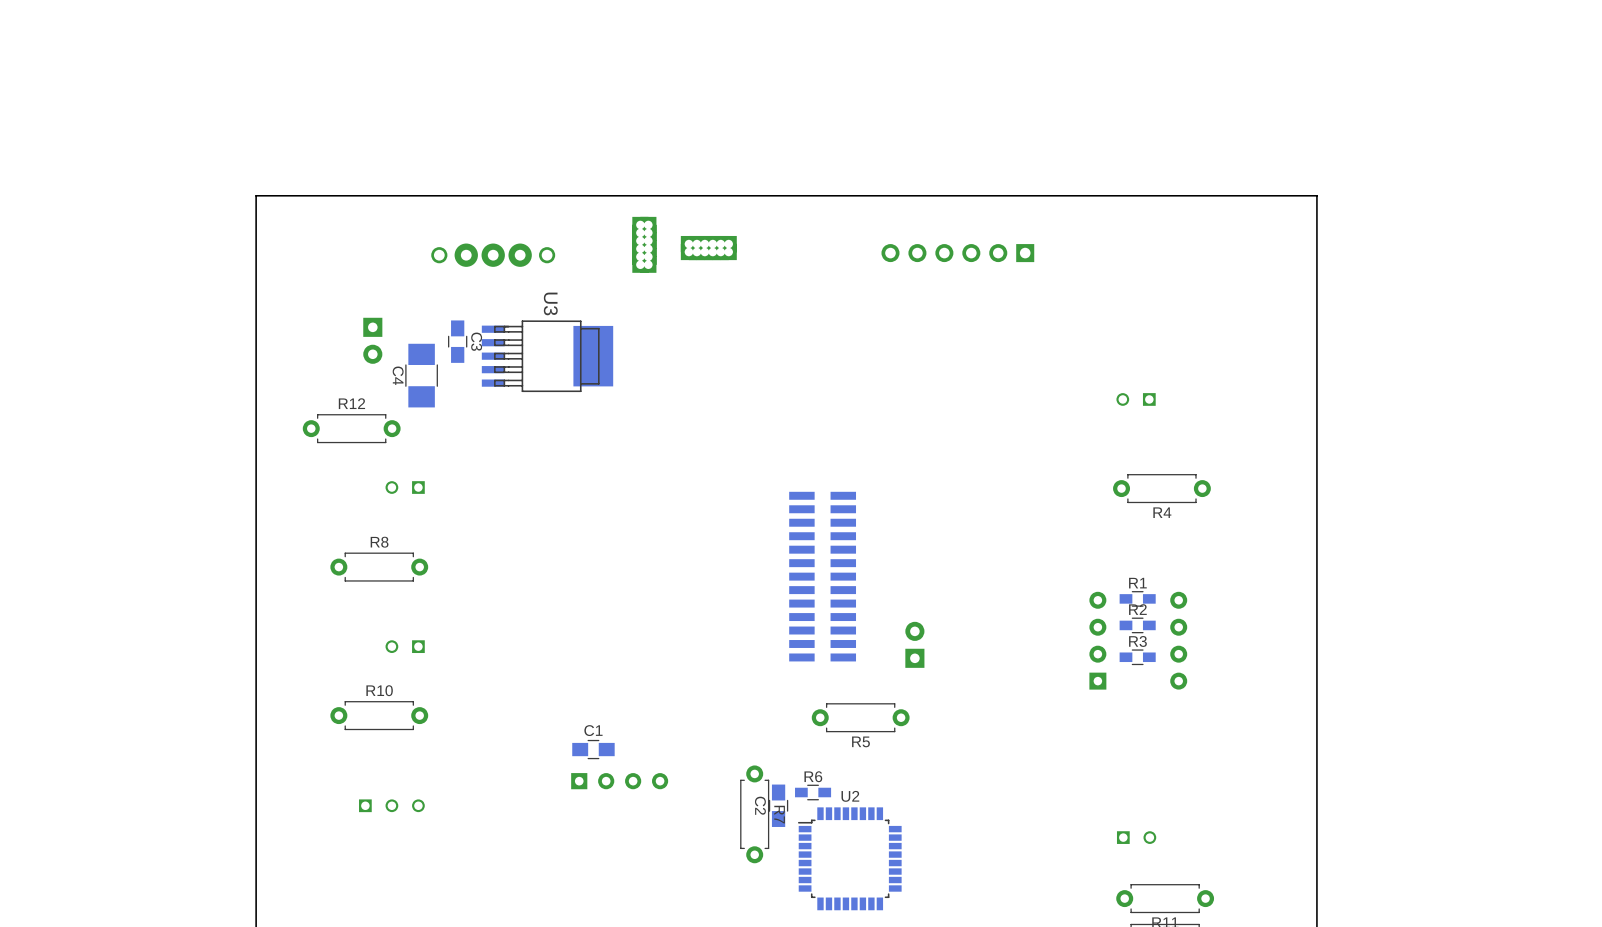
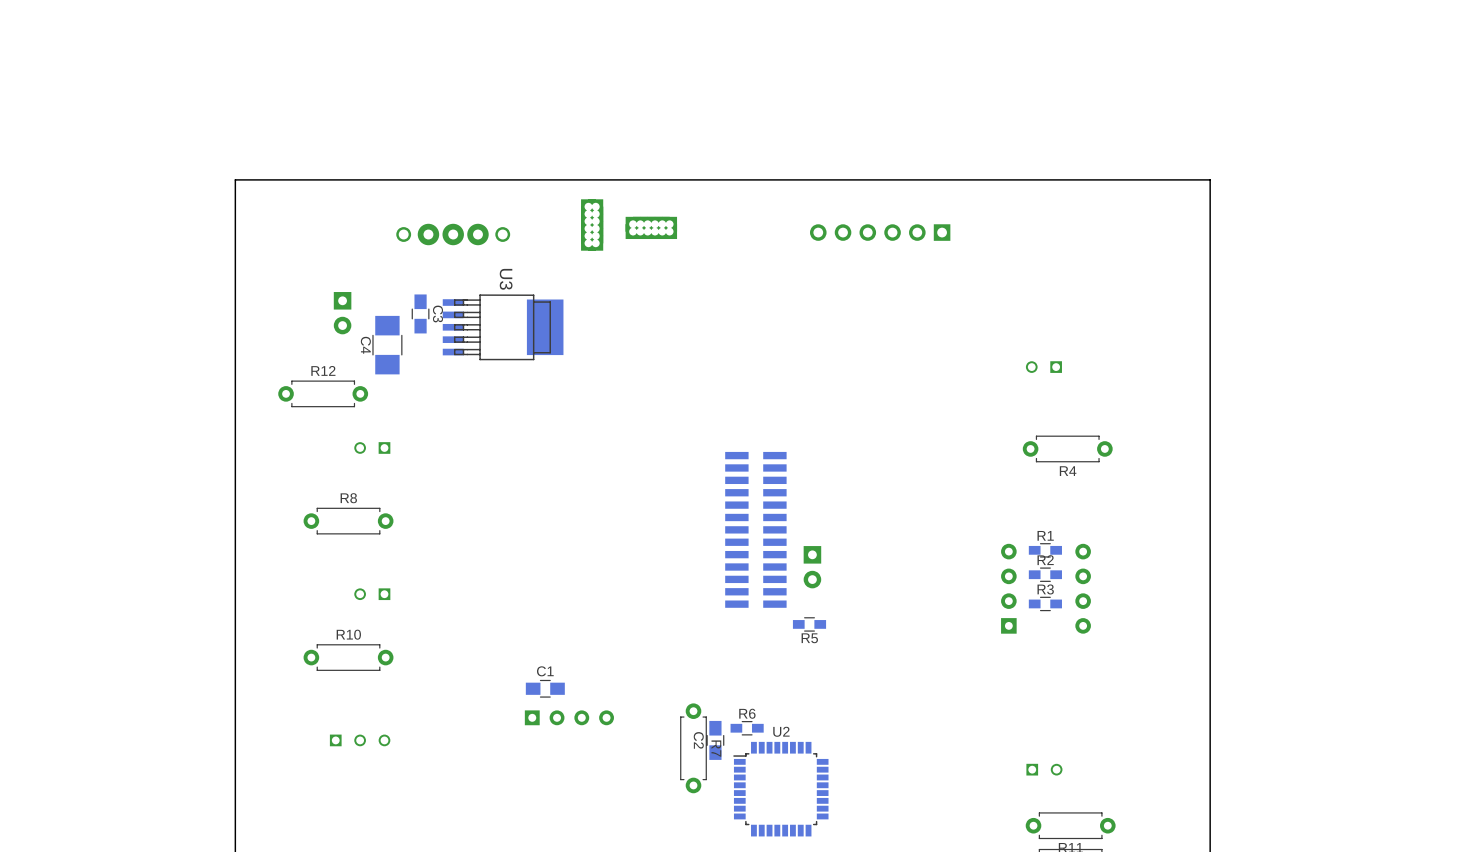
part rotation: 0° (914, 644) -> 180° (812, 567)
part position: (914, 644) -> (812, 567)
R5 footprint: [811, 703, 910, 733] -> [792, 617, 827, 632]

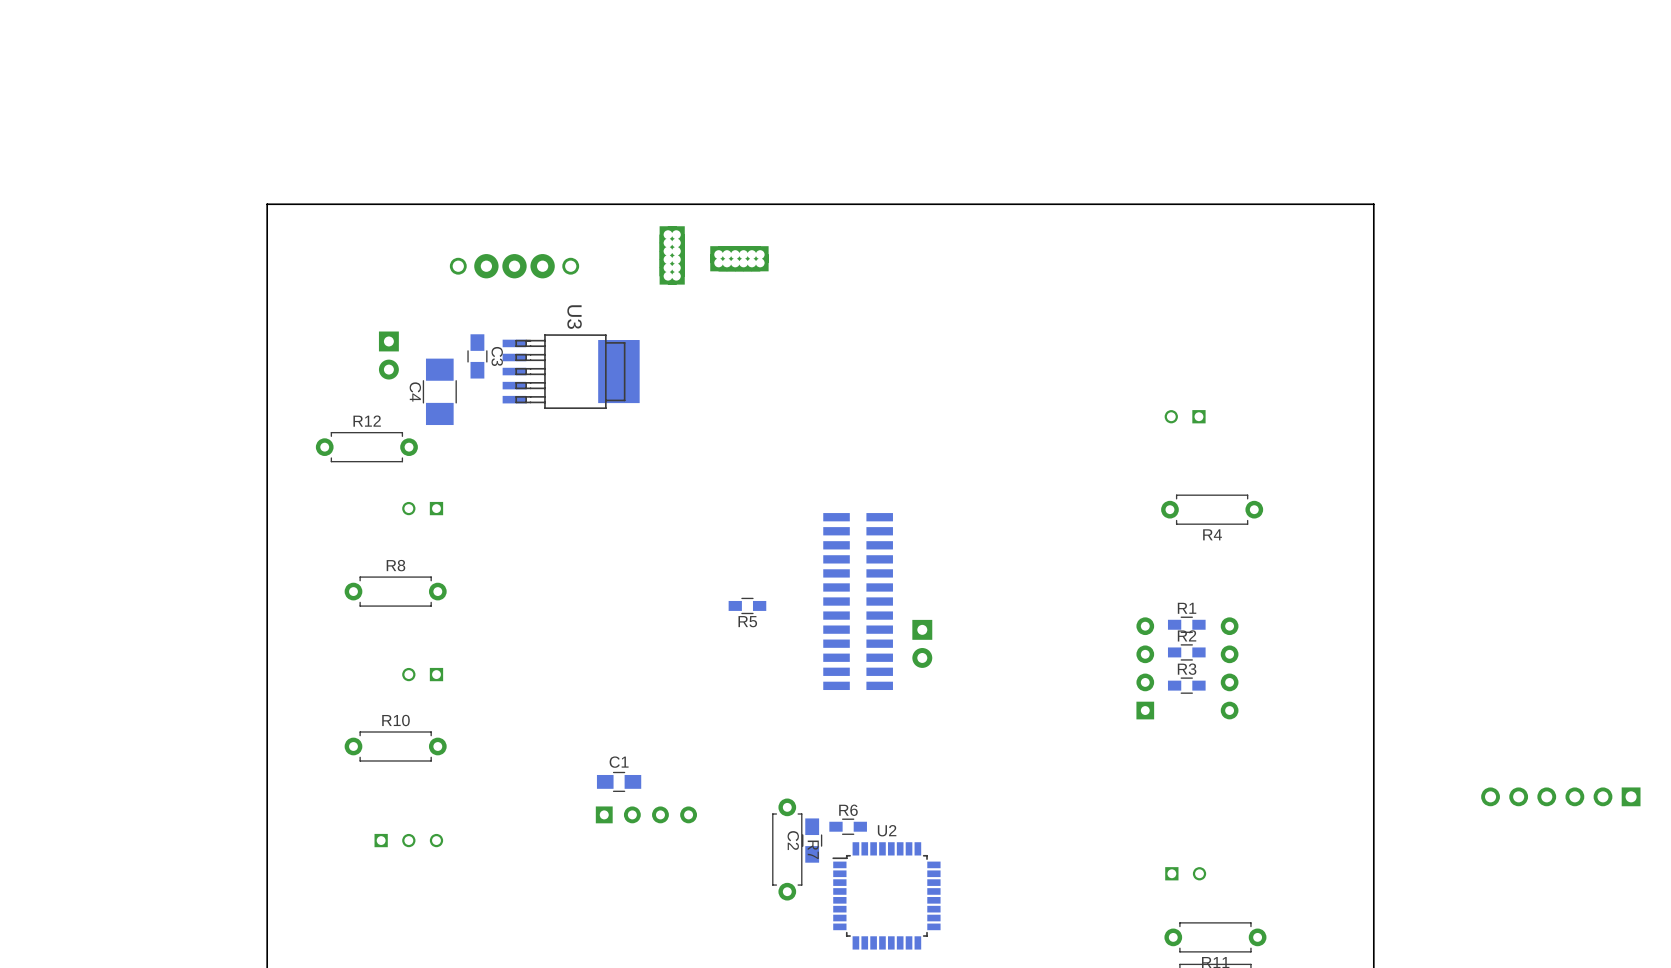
part: (880, 232) -> none
R5 position: (809, 624) -> (747, 605)
part: none -> (1560, 796)

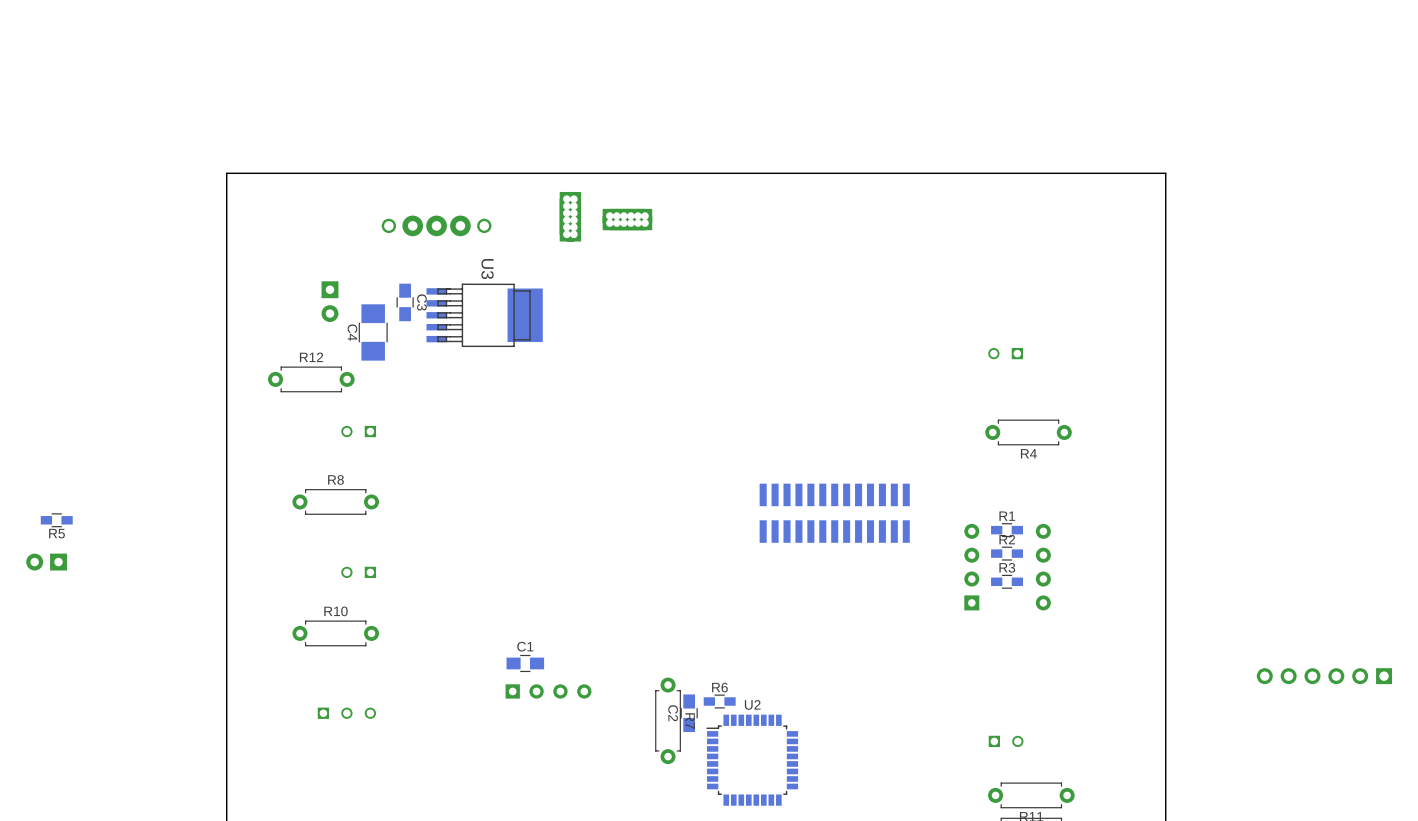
part rotation: 0° (858, 601) -> 90° clockwise (834, 513)
part position: (858, 601) -> (834, 513)
R5 position: (747, 605) -> (56, 520)
part: (922, 643) -> none
part: none -> (46, 562)

